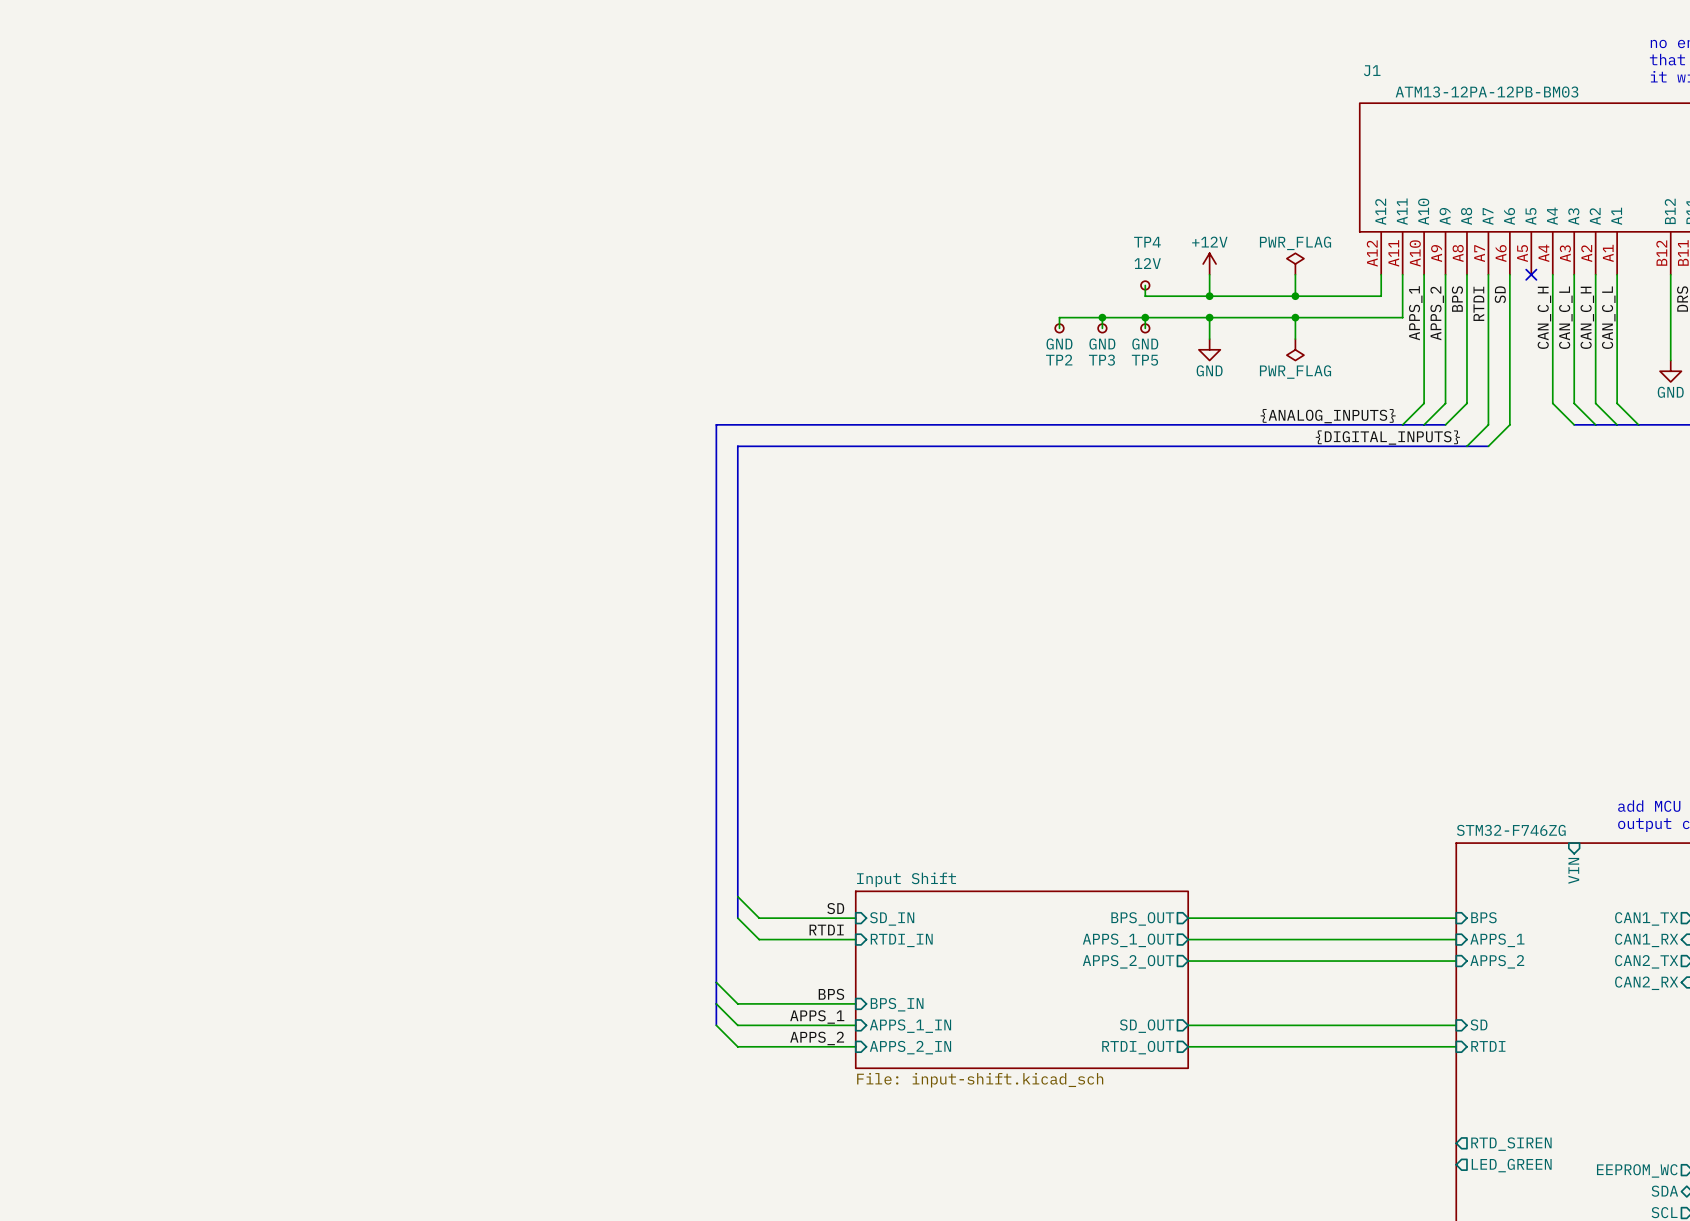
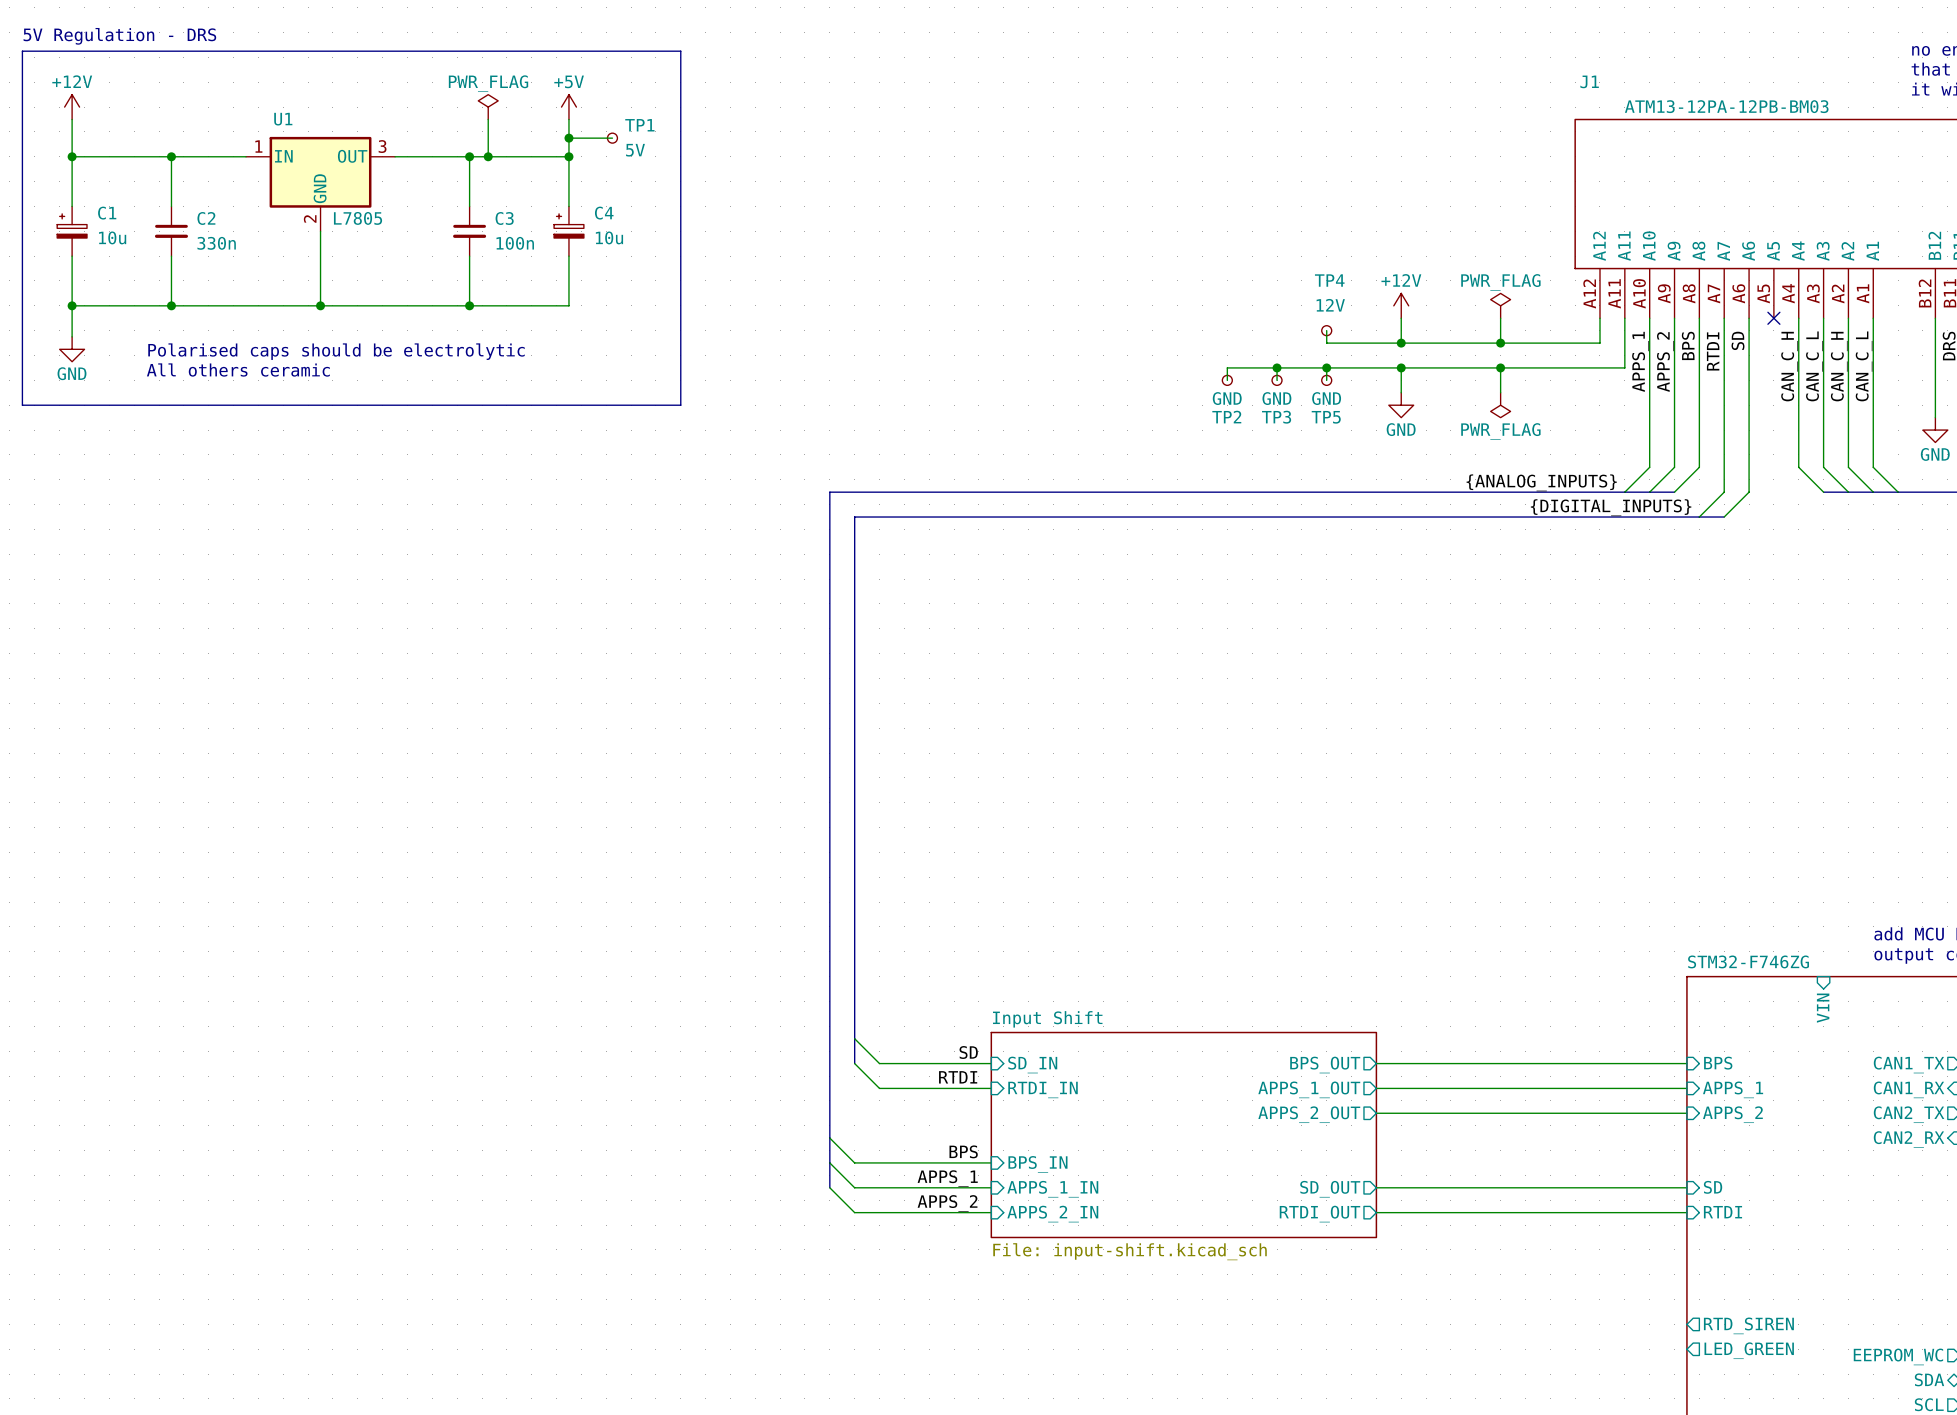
text: none -> 5V Regulation - DRS (119, 36)
line: none -> (22, 51) (680, 51) (680, 405) (22, 405) (22, 51)
power symbol: none -> +12V (72, 107)
power symbol: none -> PWR_FLAG (488, 107)
power symbol: none -> +5V (568, 107)
wire: none -> (72, 119) (72, 206)
wire: none -> (488, 119) (488, 156)
wire: none -> (568, 119) (568, 206)
wire: none -> (568, 138) (612, 138)
junction: none -> (568, 138)
TP1: none -> 5V (612, 138)
wire: none -> (72, 156) (246, 156)
junction: none -> (72, 156)
wire: none -> (171, 156) (171, 206)
junction: none -> (171, 156)
wire: none -> (395, 156) (568, 156)
wire: none -> (469, 156) (469, 206)
junction: none -> (469, 156)
junction: none -> (488, 156)
junction: none -> (568, 156)
U1: none -> L7805 (320, 184)
C1: none -> 10u (72, 231)
C2: none -> 330n (171, 231)
wire: none -> (320, 231) (320, 305)
C3: none -> 100n (469, 231)
C4: none -> 10u (568, 231)
wire: none -> (72, 256) (72, 336)
wire: none -> (171, 256) (171, 305)
wire: none -> (469, 256) (469, 305)
wire: none -> (568, 256) (568, 305) (72, 305)
junction: none -> (72, 305)
junction: none -> (171, 305)
junction: none -> (320, 305)
junction: none -> (469, 305)
power symbol: none -> GND (72, 349)
text: none -> Polarised caps should be electrolytic (336, 351)
text: none -> All others ceramic (238, 370)

